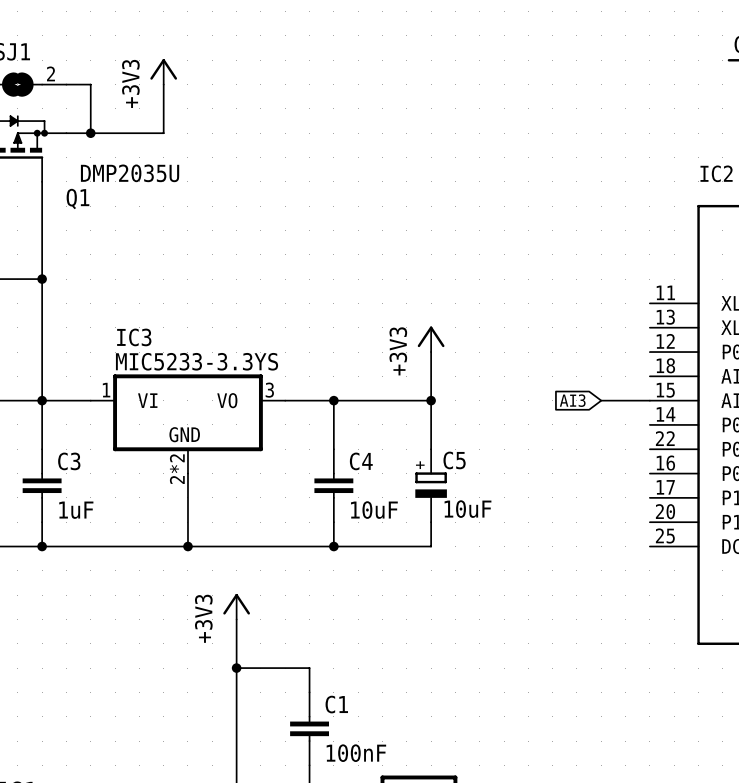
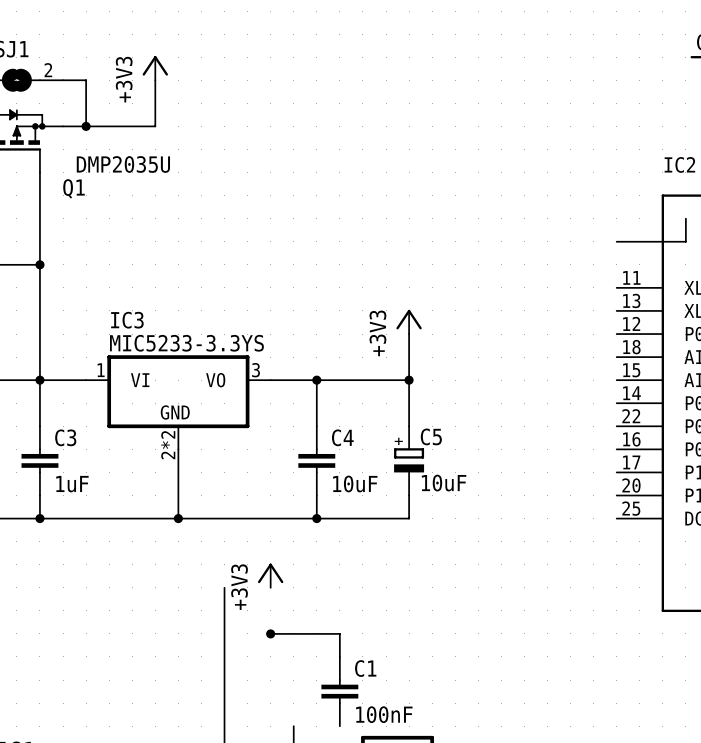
wire: none -> (685, 218) (685, 241) (616, 241)
global label: AI3 (572, 400) -> none
wire: (601, 400) (649, 400) -> none
power symbol position: +3V3 (236, 606) -> +3V3 (270, 575)
wire: (236, 668) (285, 668) -> none
junction position: (236, 668) -> (270, 633)
wire: (309, 668) (309, 692) -> (293, 633) (339, 633) (339, 656)
C1 position: (309, 728) -> (339, 691)

